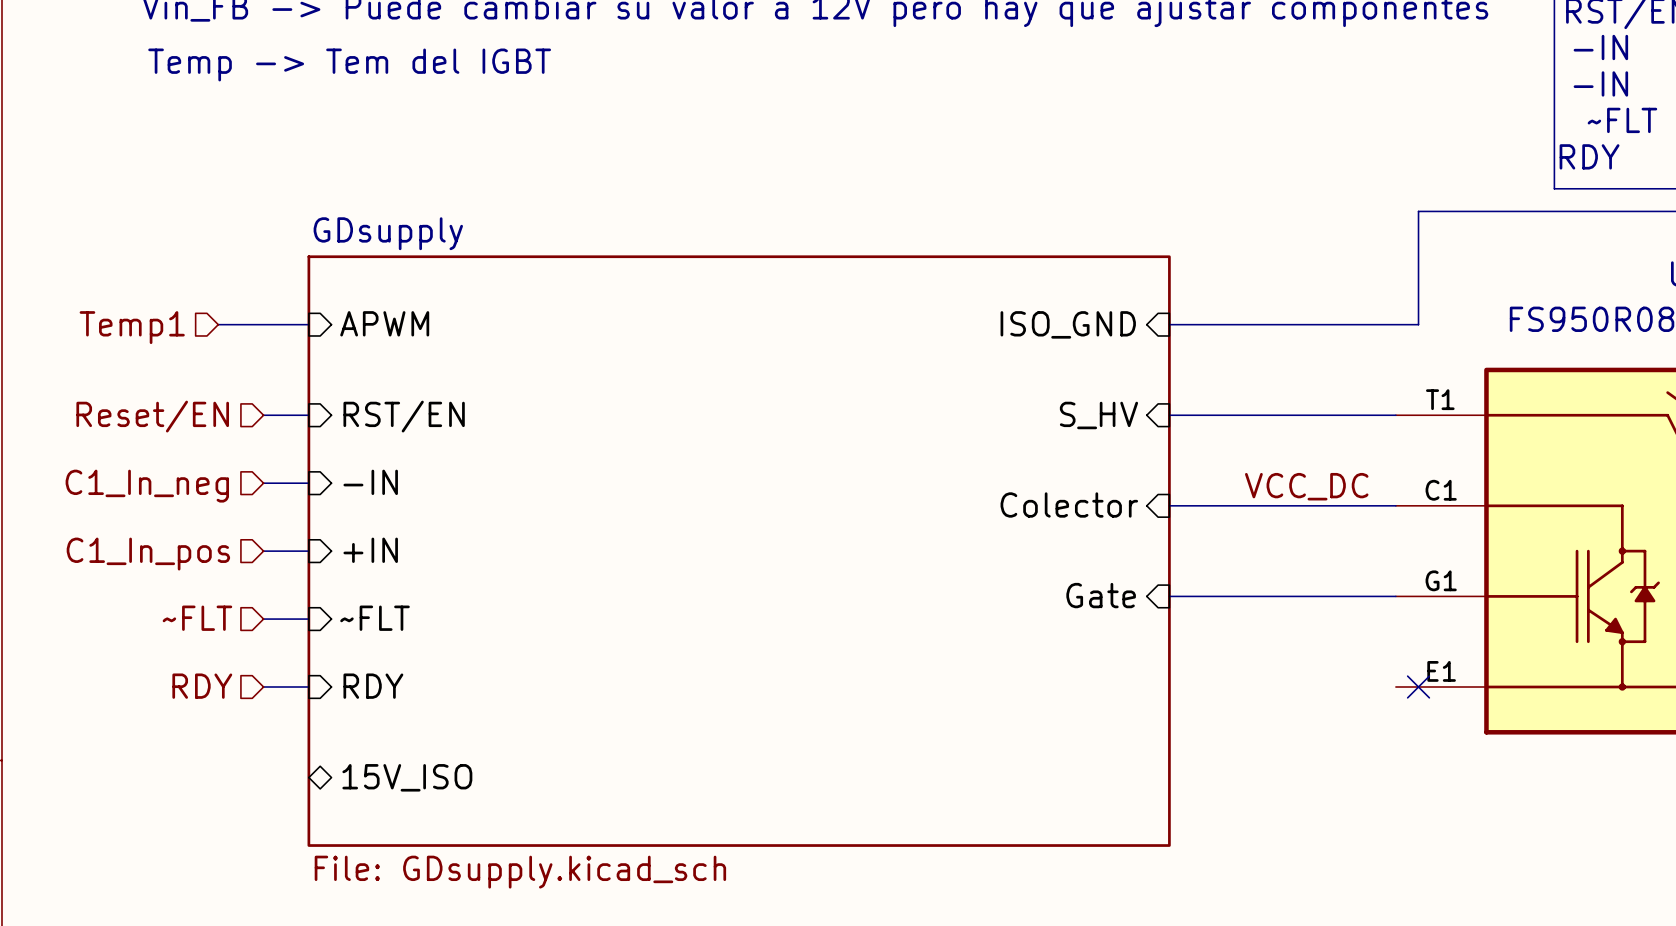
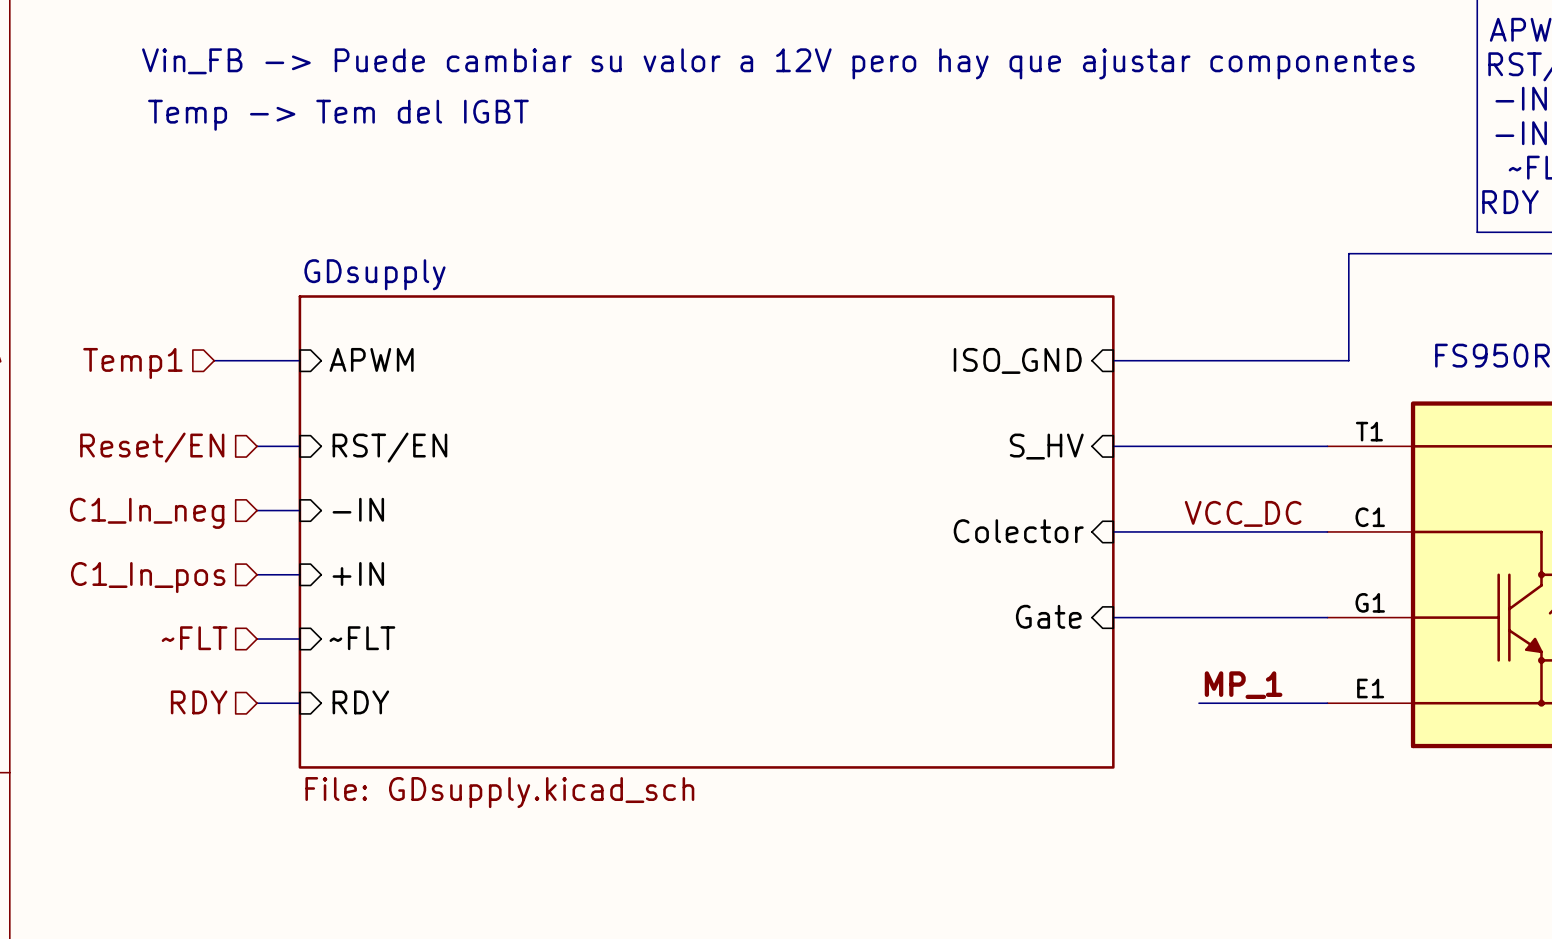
sheet GDsupply: none -> File: GDsupply.kicad_sch (706, 531)
sheet GDsupply: File: GDsupply.kicad_sch (739, 551) -> none
label: none -> MP_1 (1243, 685)
wire: none -> (1198, 703) (1327, 703)
no-connect mark: (1418, 687) -> none
sheet pin: 15V_ISO (407, 777) -> none

